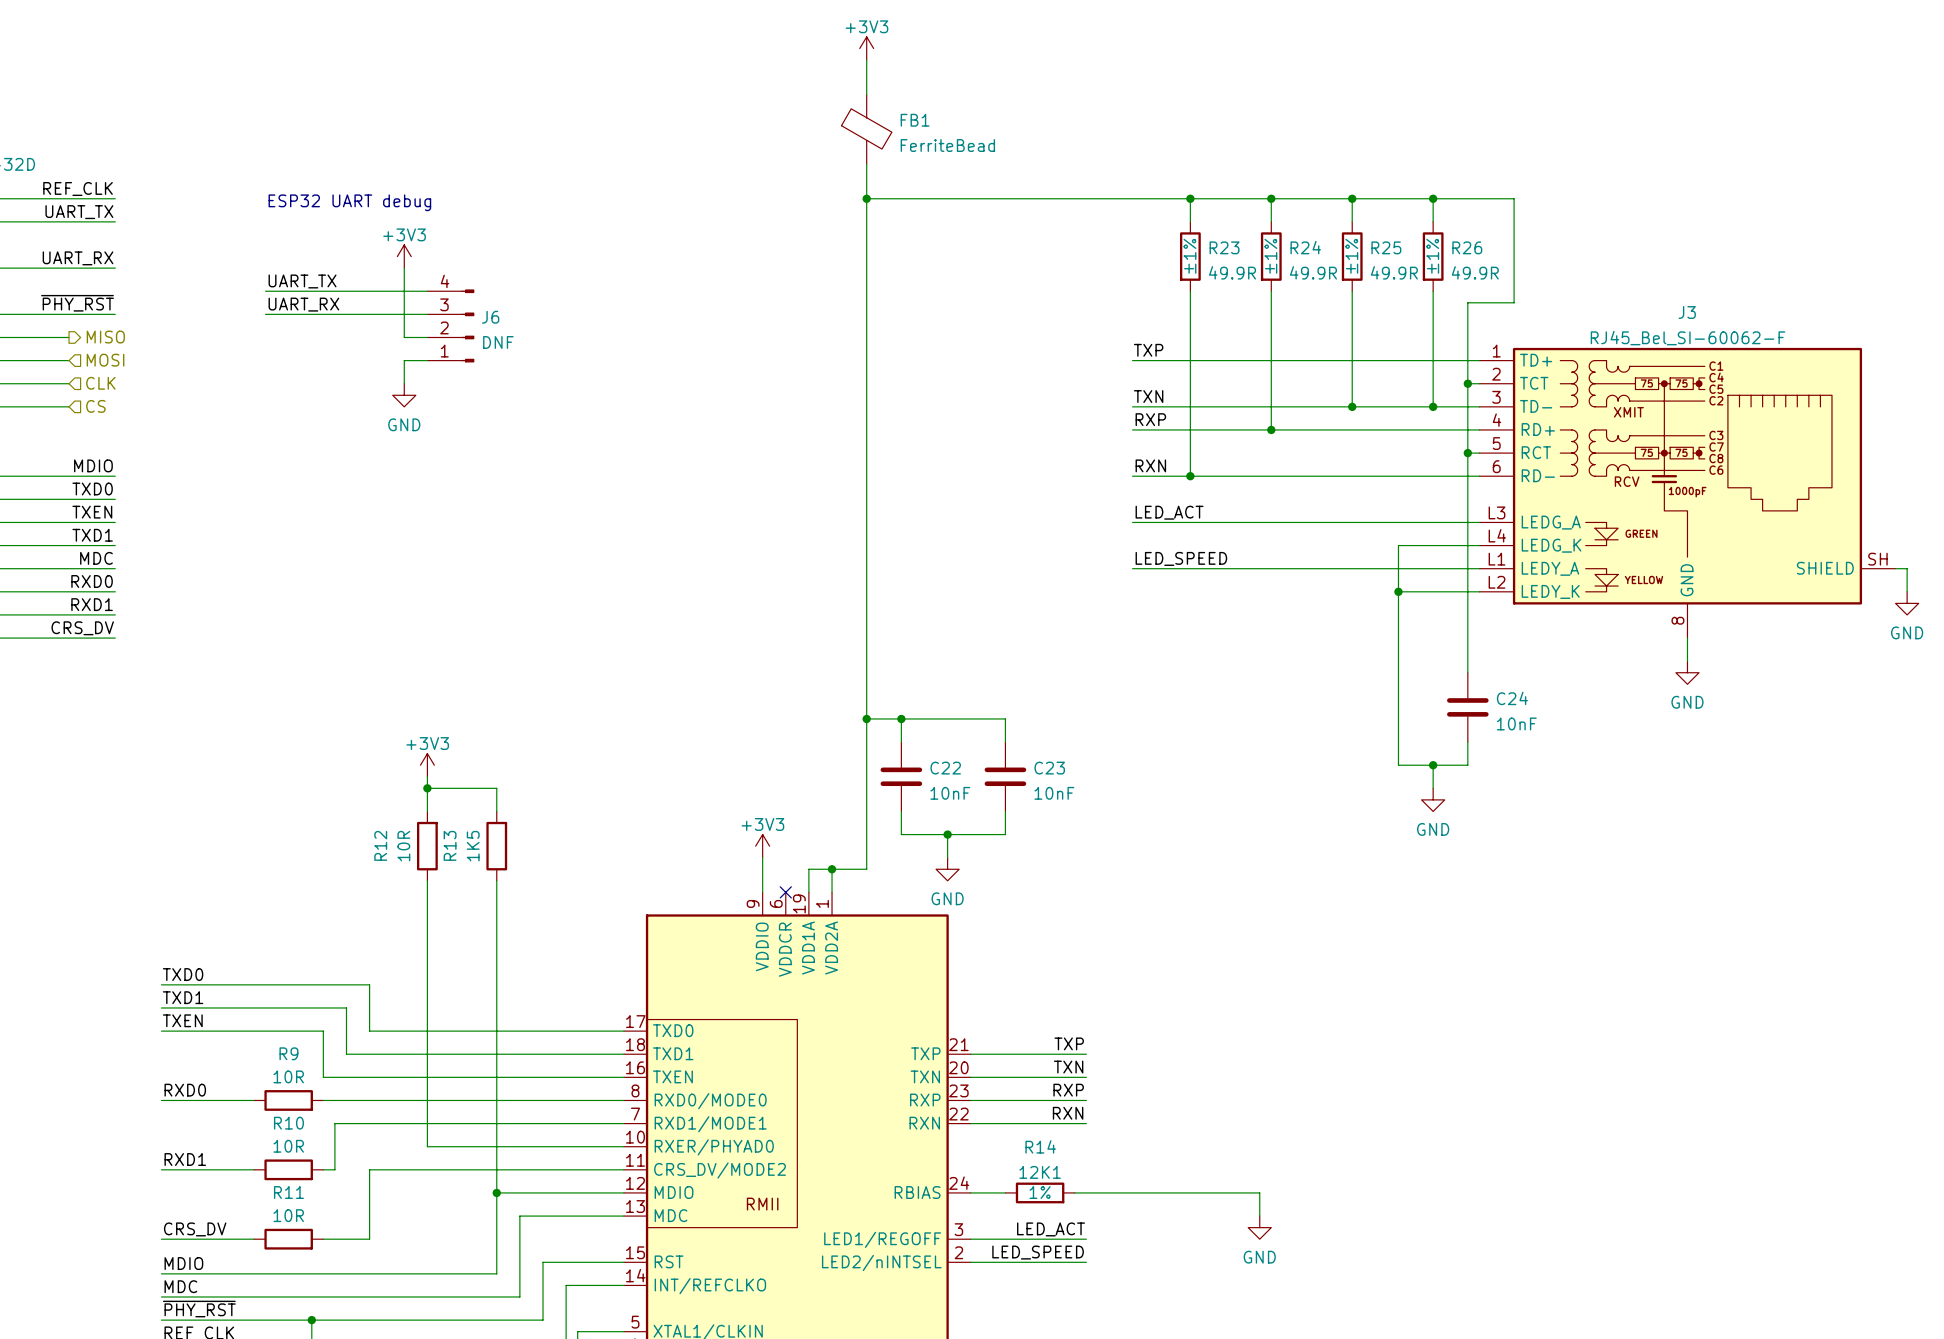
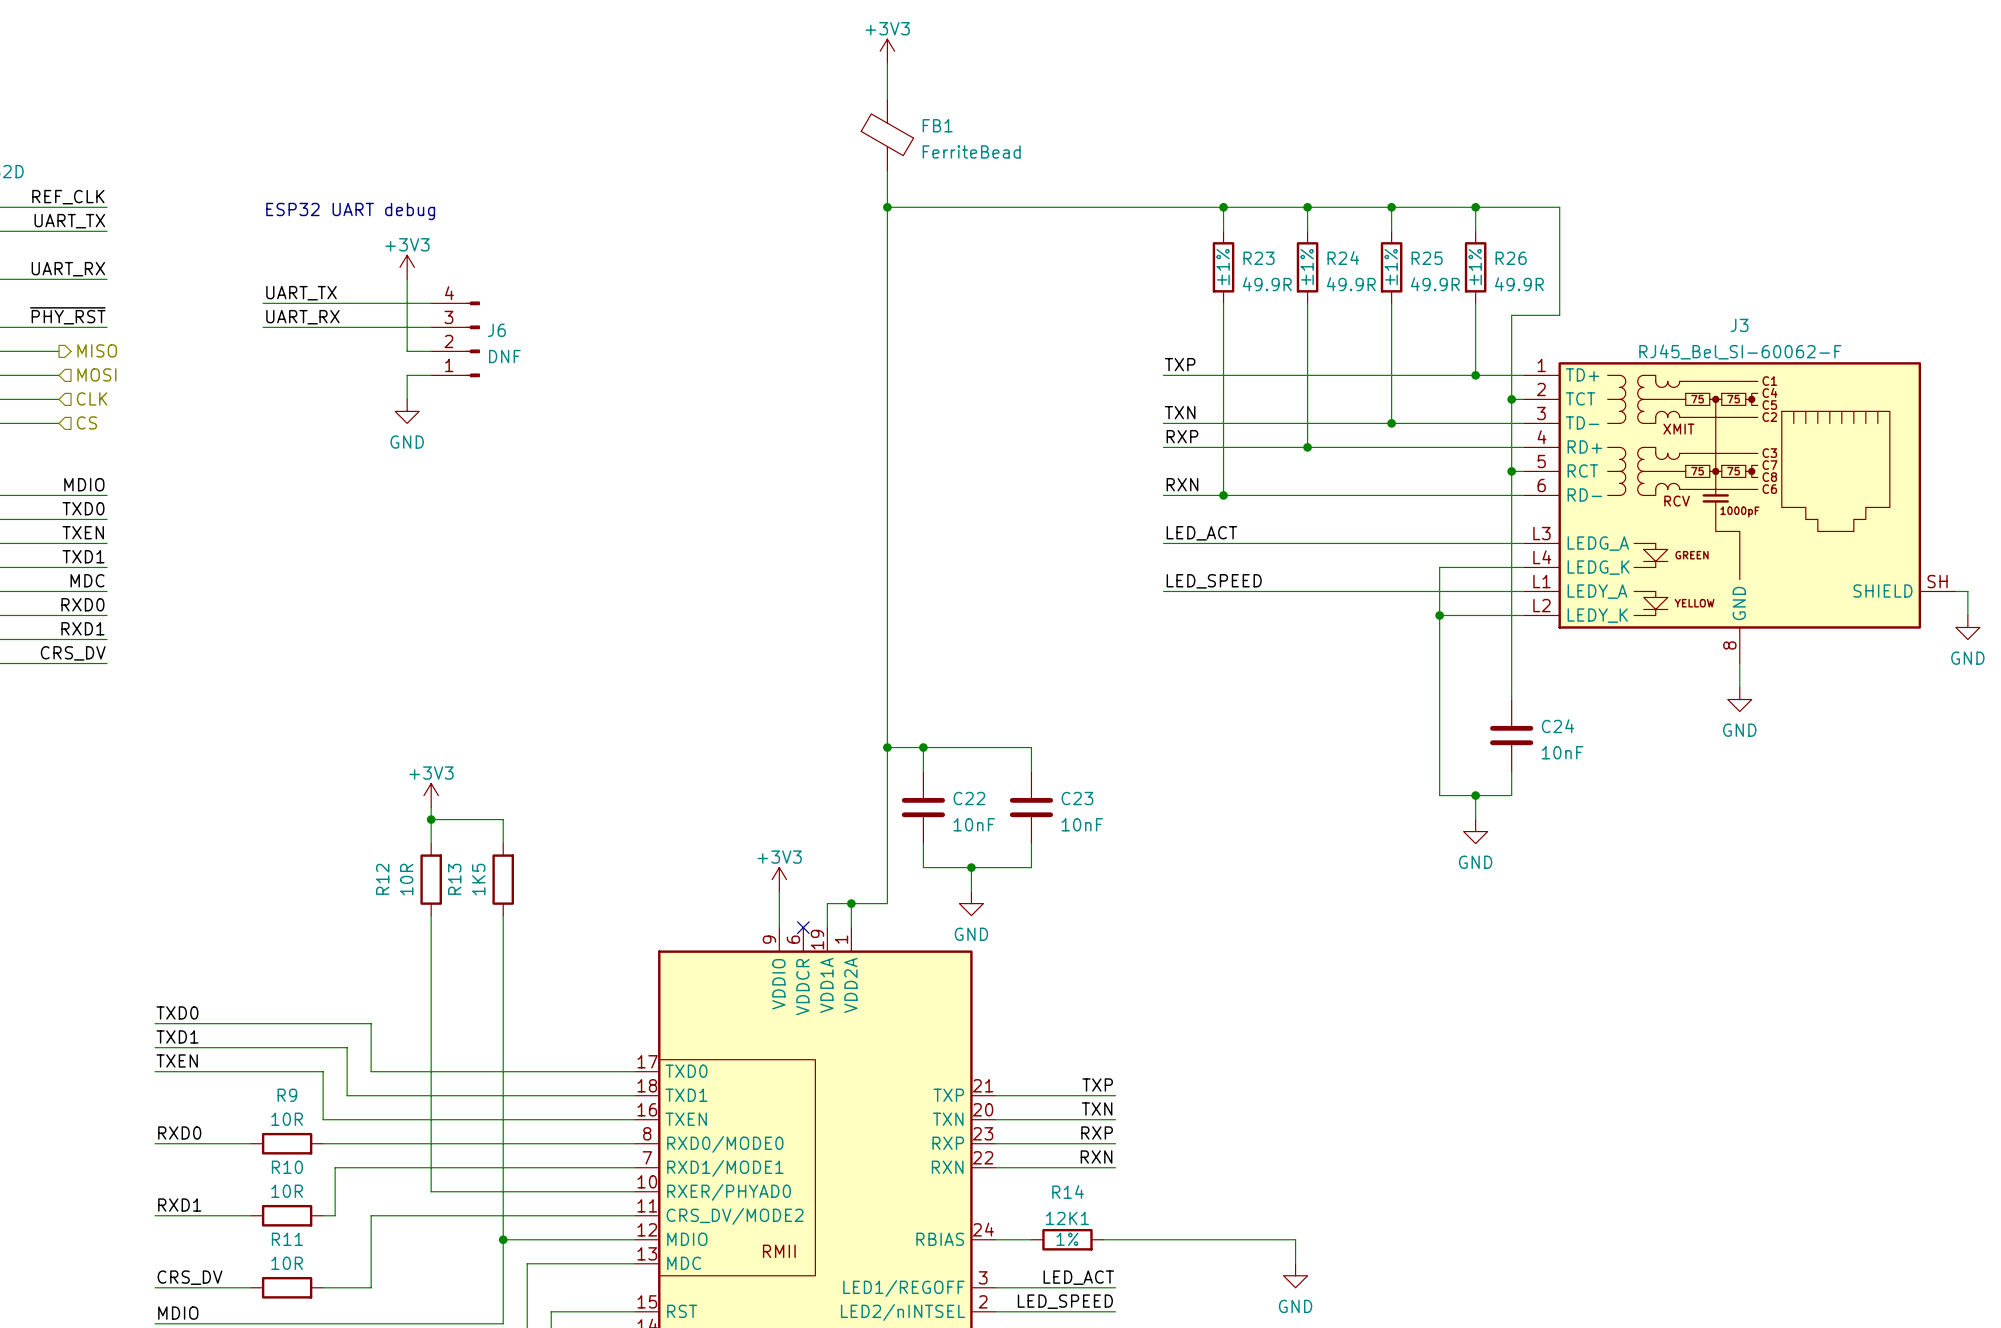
wire: (1433, 360) (1433, 406) -> none
junction position: (1433, 406) -> (1475, 375)

